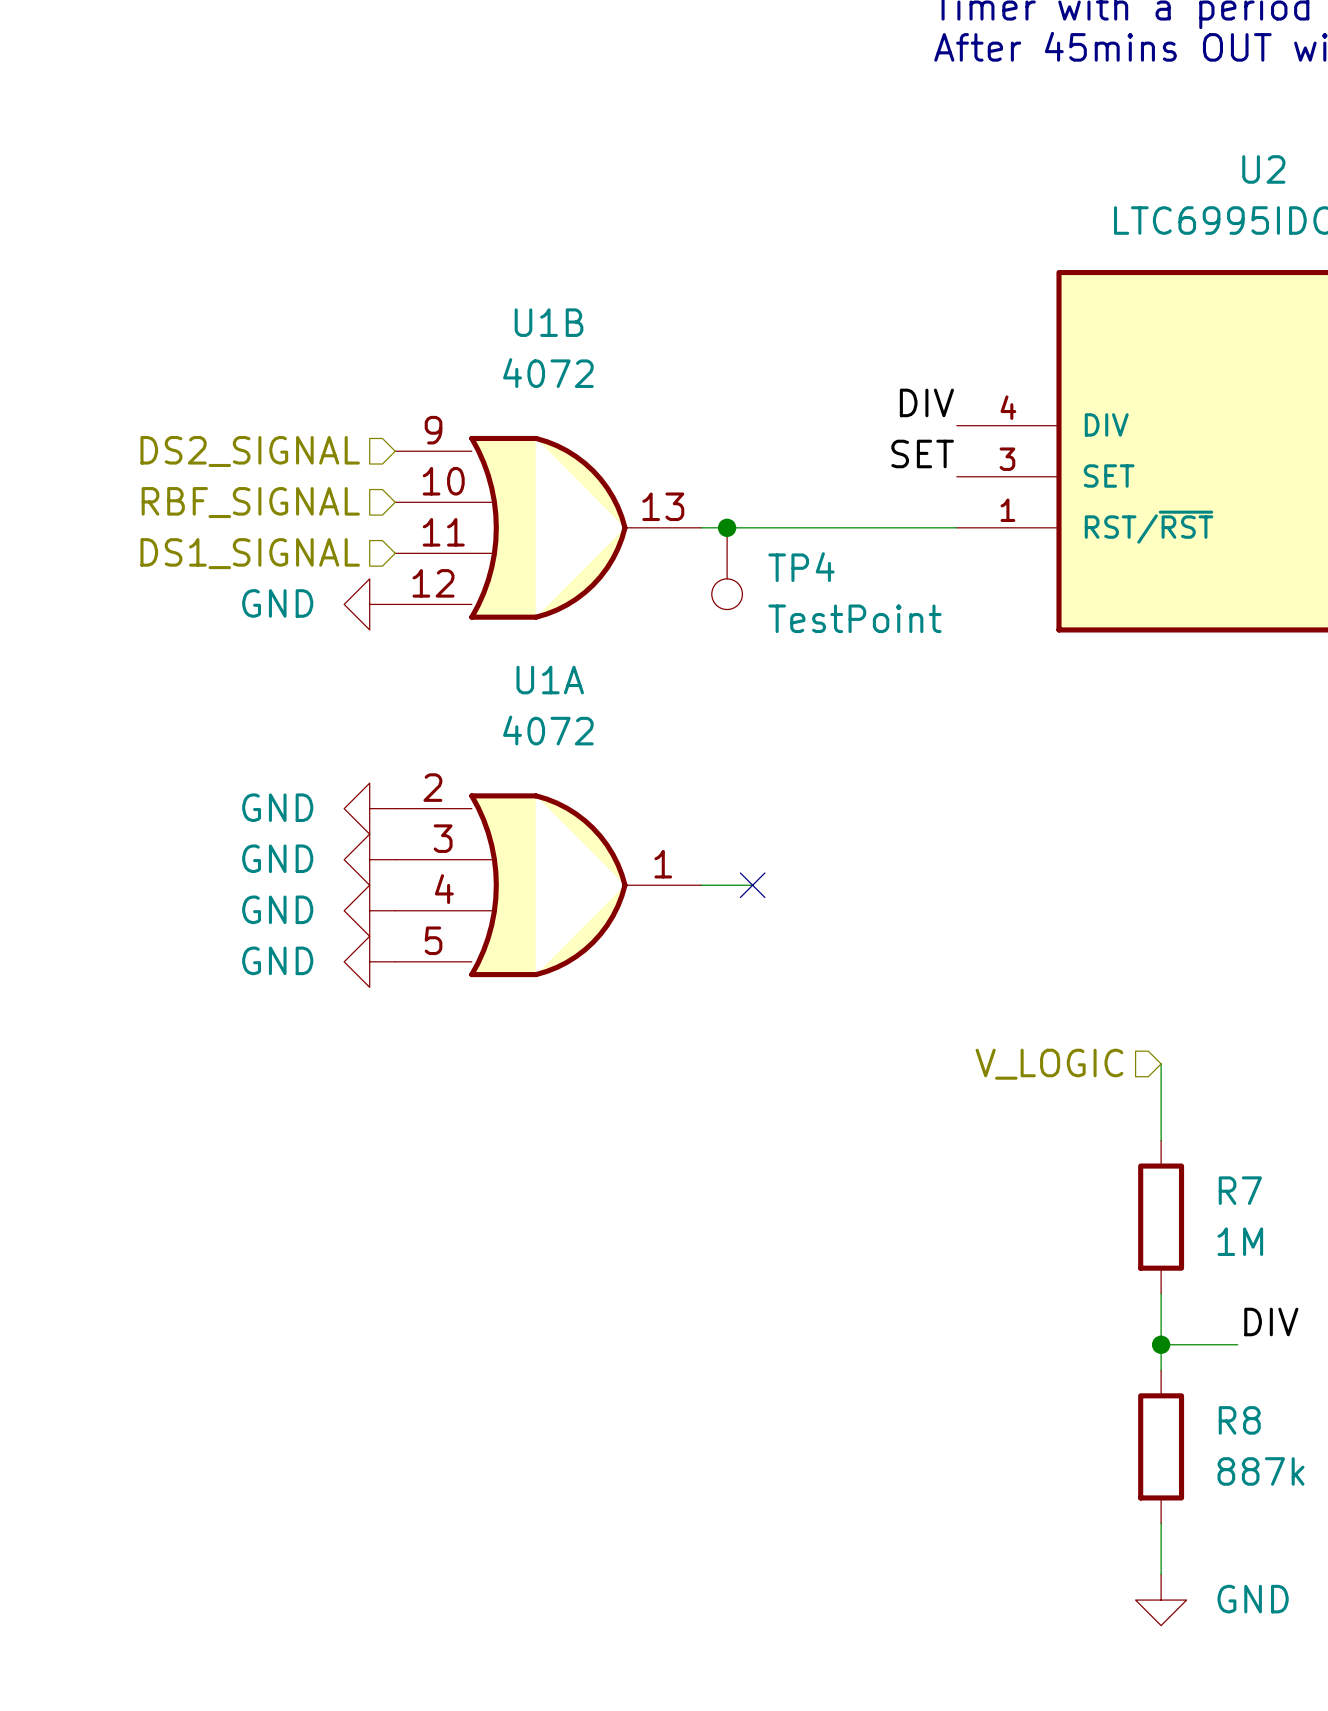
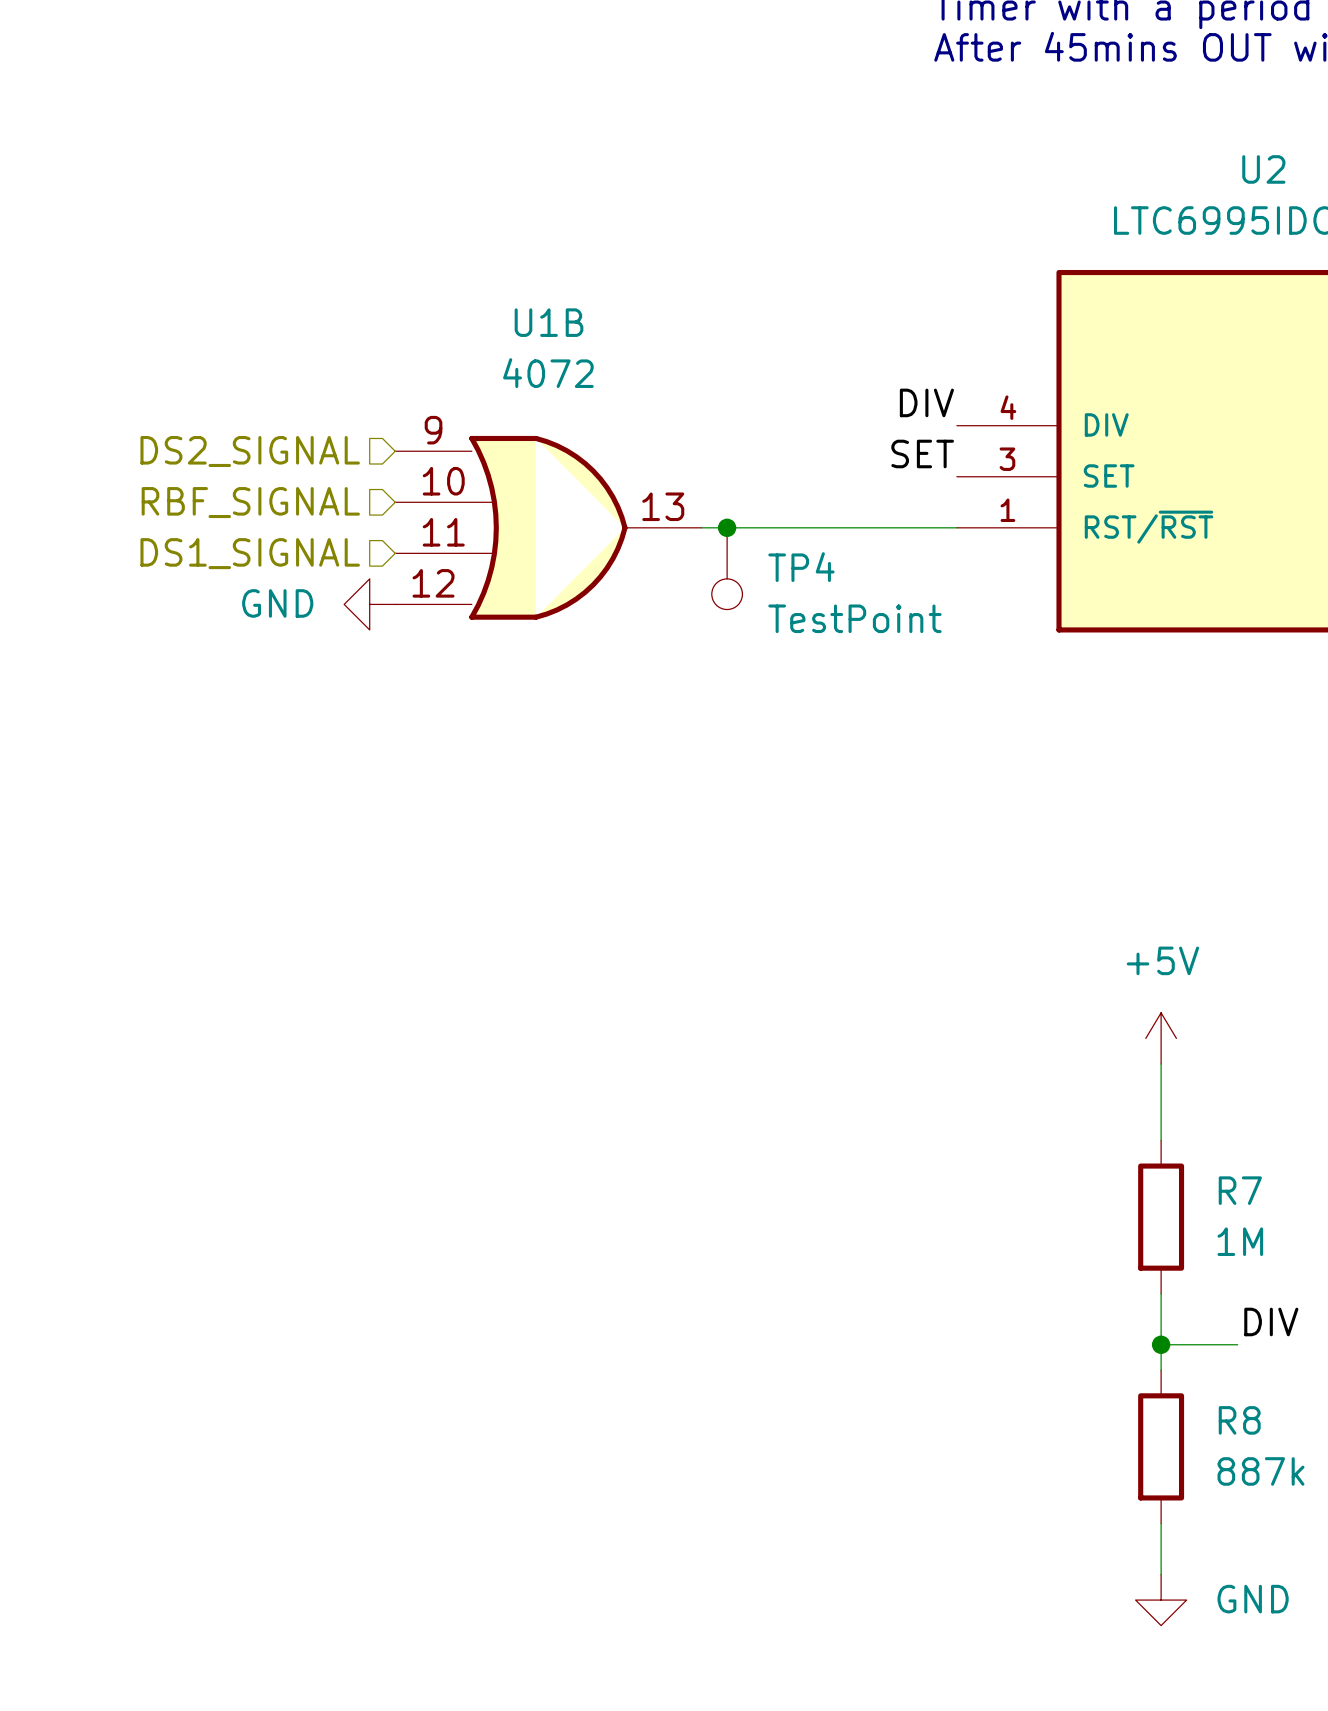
power symbol: GND (369, 808) -> none
power symbol: GND (369, 859) -> none
U1A: 4072 (548, 885) -> none
wire: (701, 885) (752, 885) -> none
no-connect mark: (752, 885) -> none
power symbol: GND (369, 910) -> none
power symbol: GND (369, 961) -> none
power symbol: none -> +5V (1161, 1038)
hierarchical label: V_LOGIC (1049, 1064) -> none

